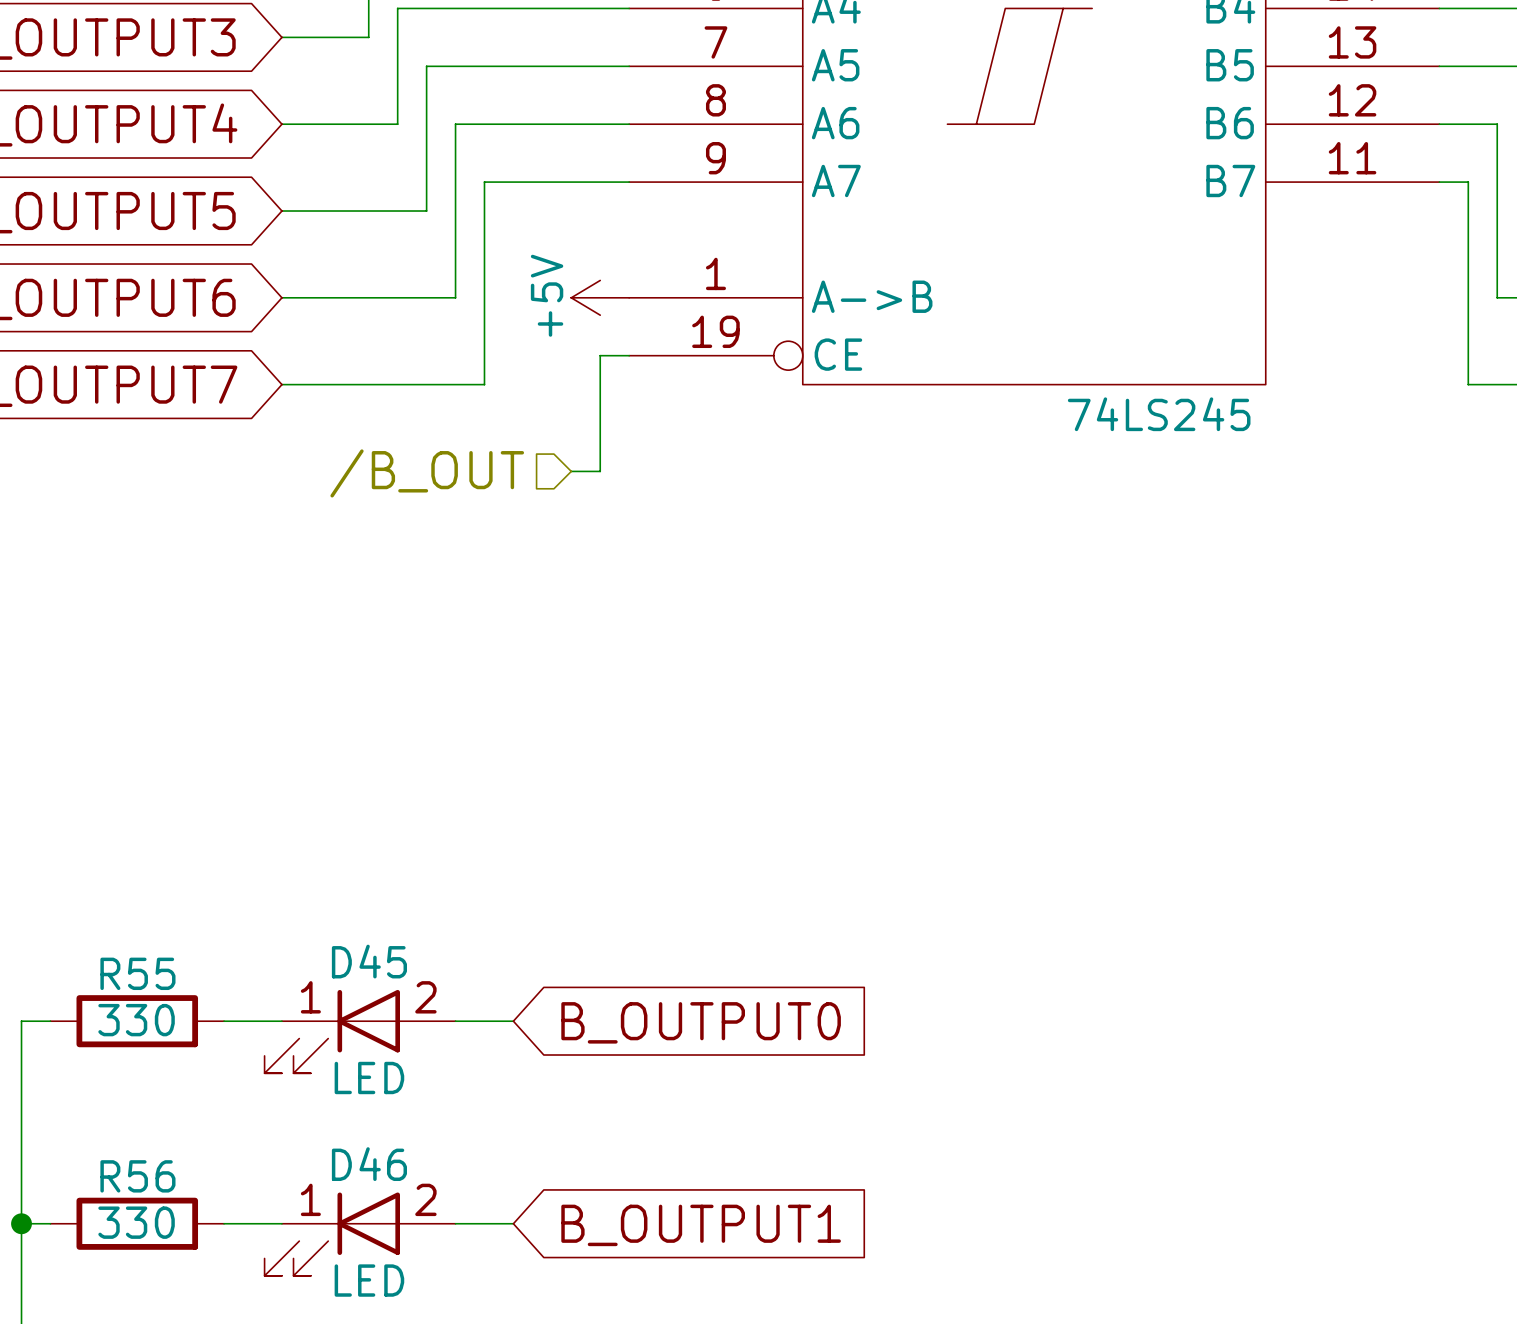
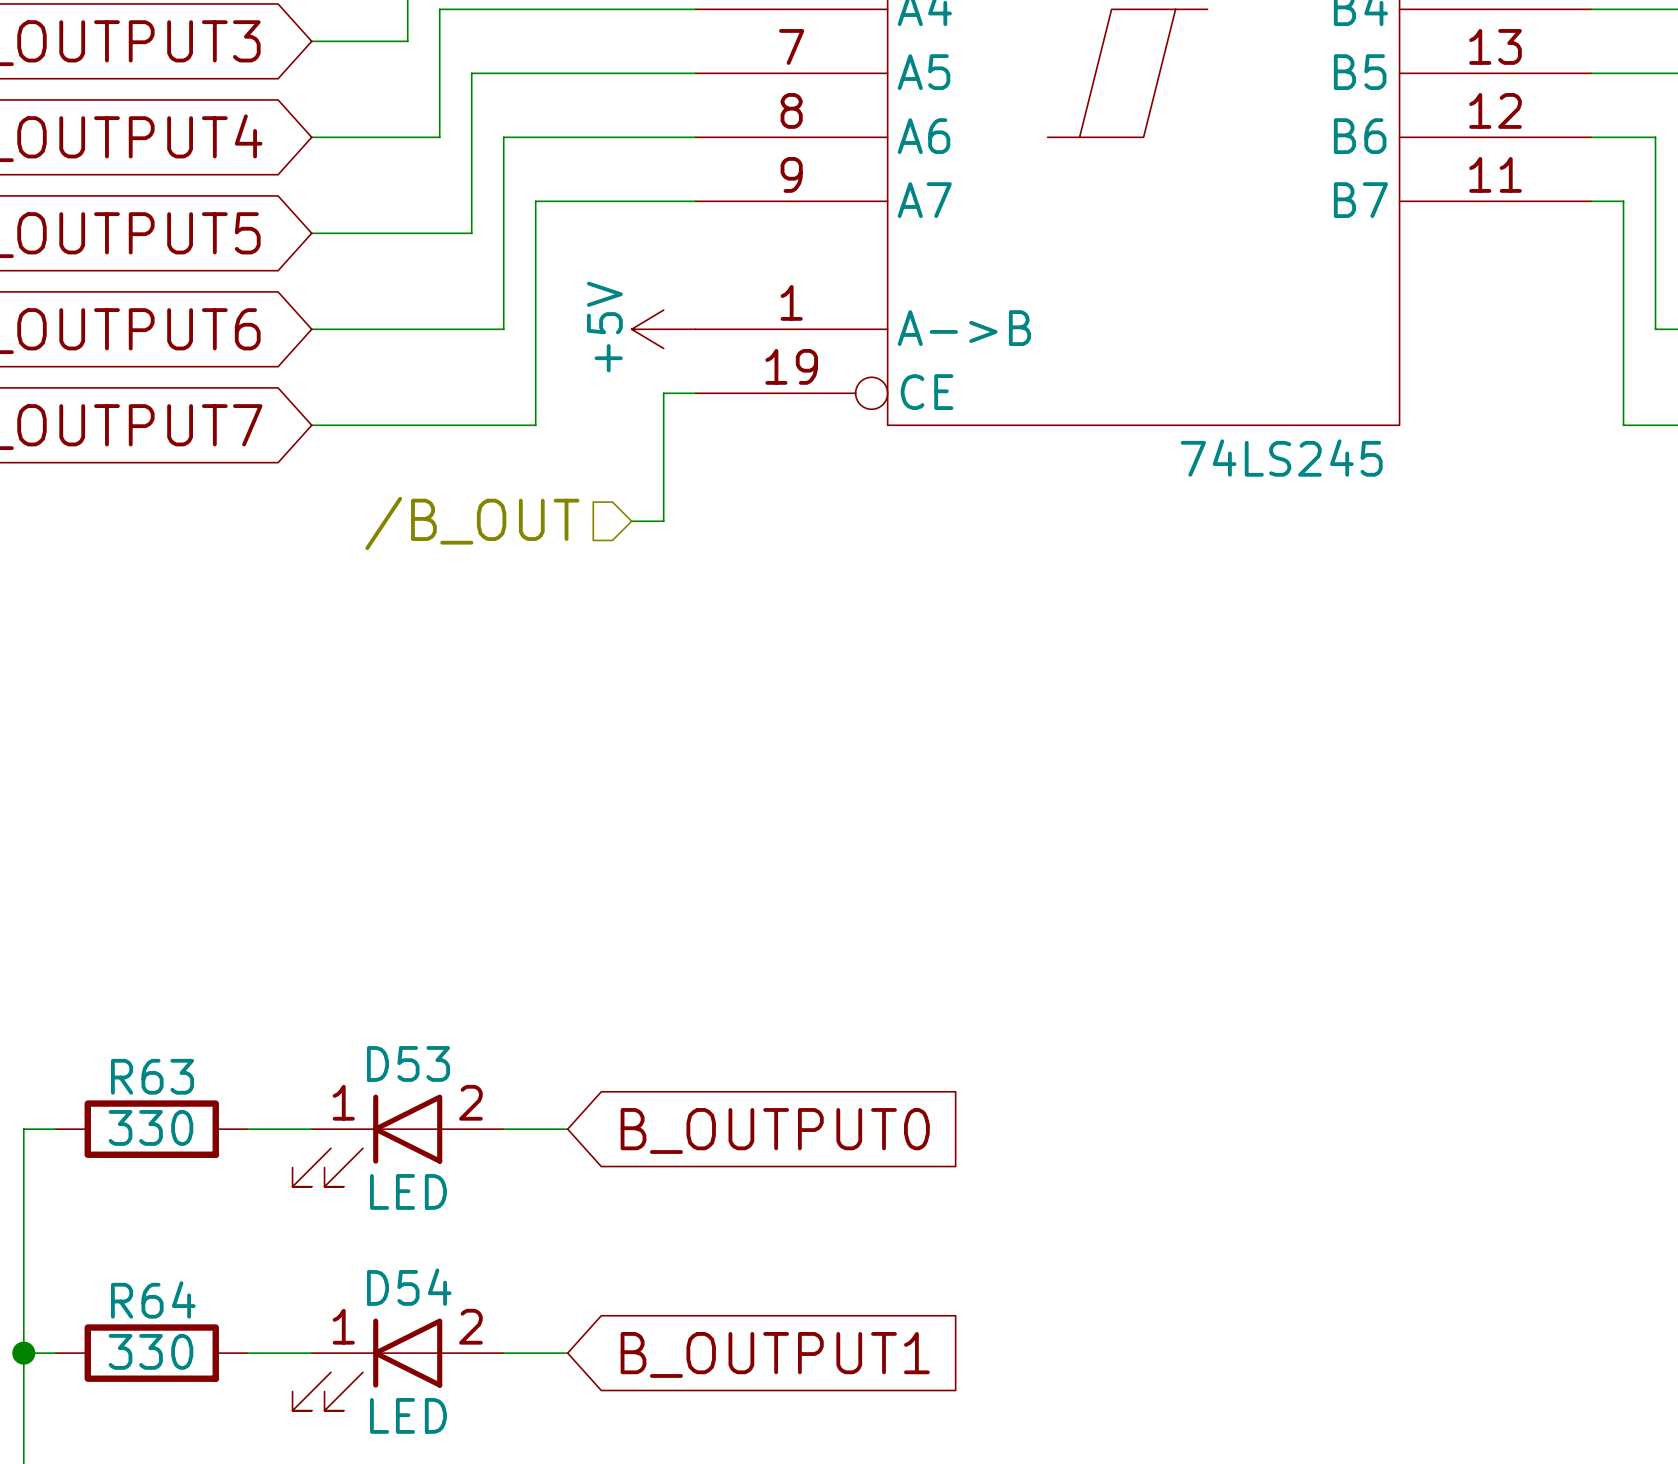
D45 name: D45 (369, 961) -> D53 (408, 1063)
R55 name: R55 (137, 973) -> R63 (152, 1076)
D46 name: D46 (369, 1164) -> D54 (409, 1287)
R56 name: R56 (137, 1176) -> R64 (153, 1299)

